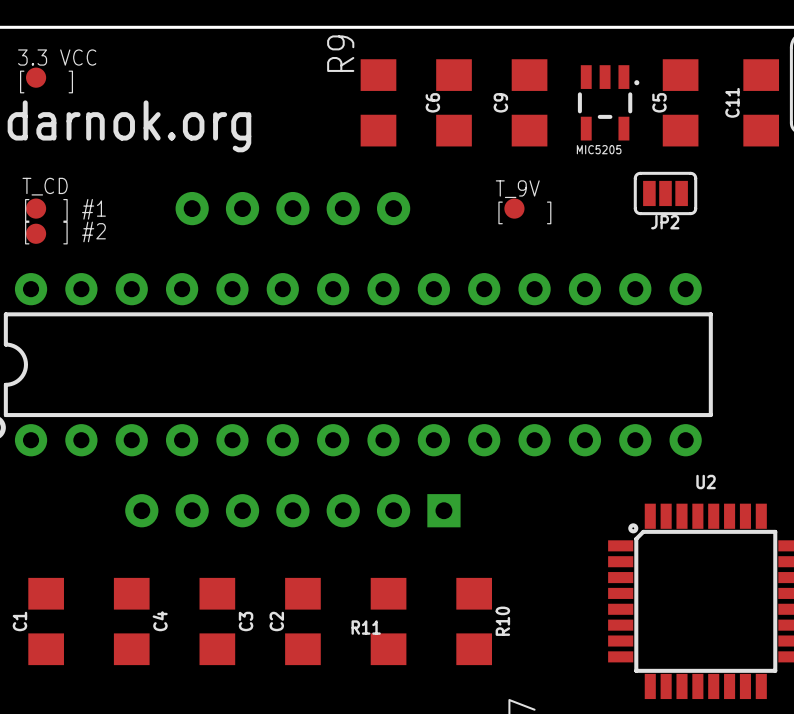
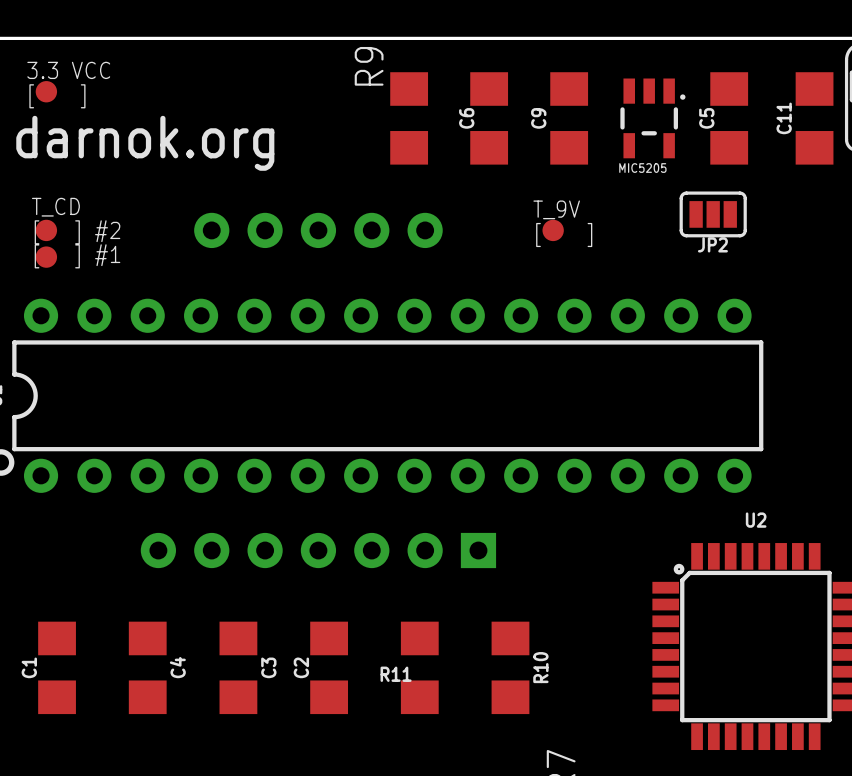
text: [ ] #1 (65, 210) -> [ ] #2 (77, 232)
text: [ ] #2 (65, 233) -> [ ] #1 (77, 256)

